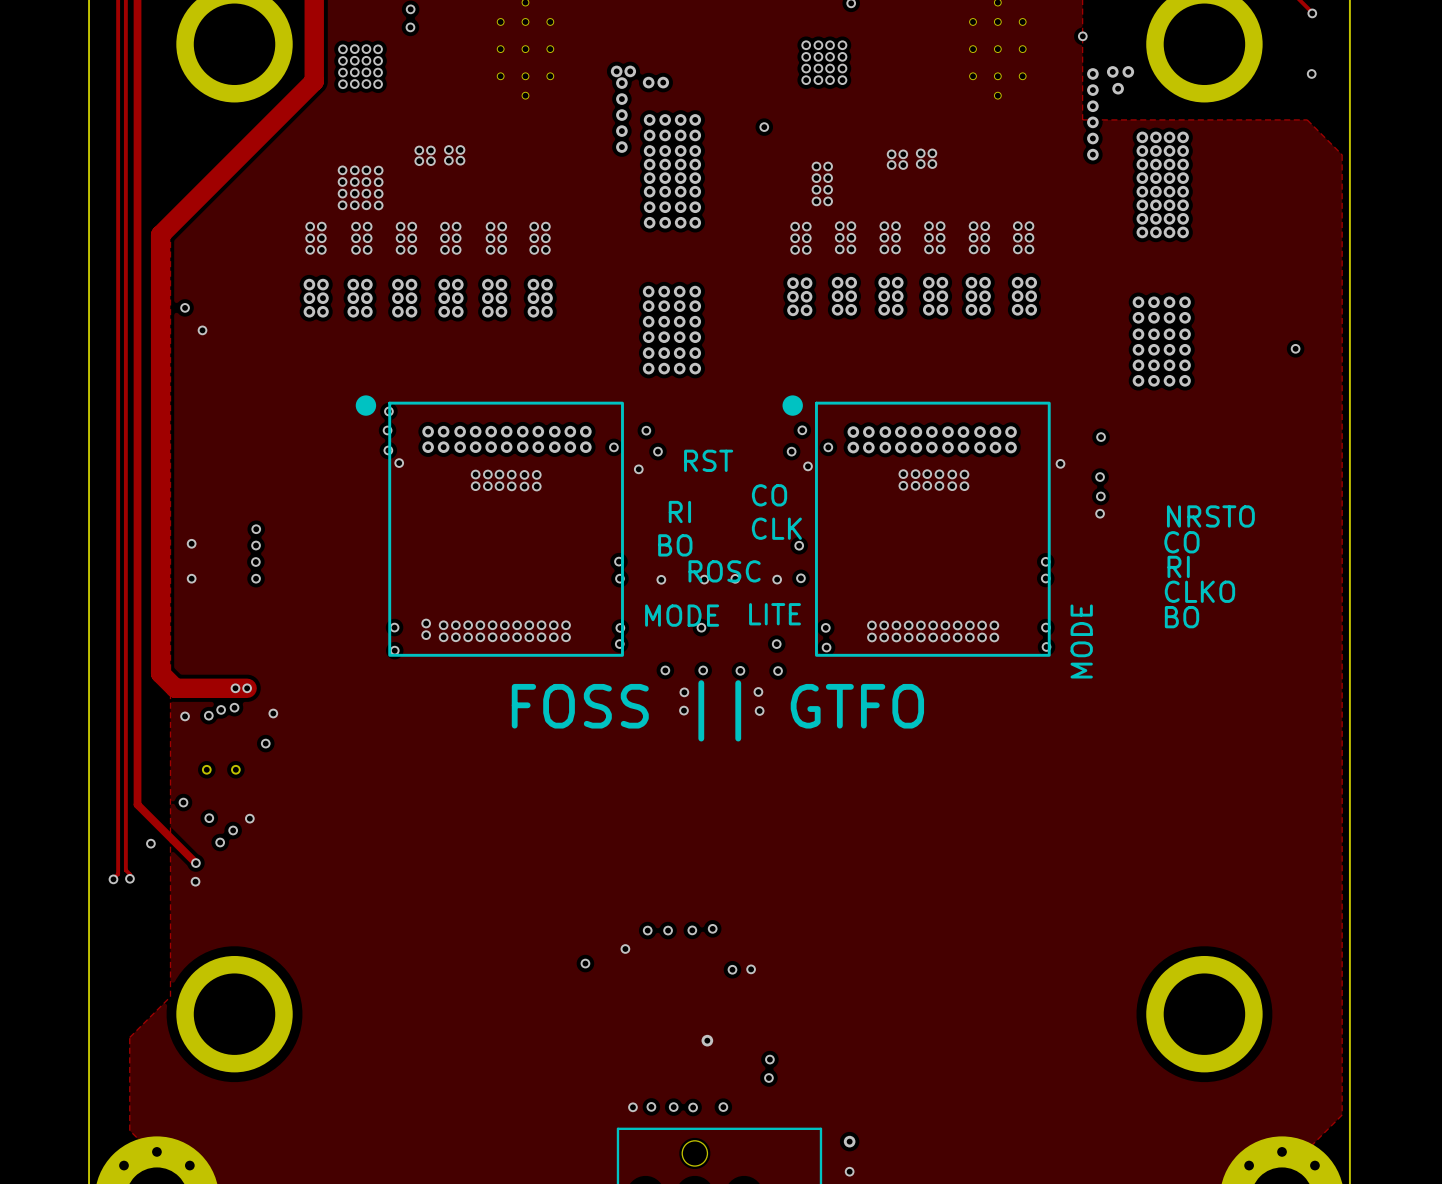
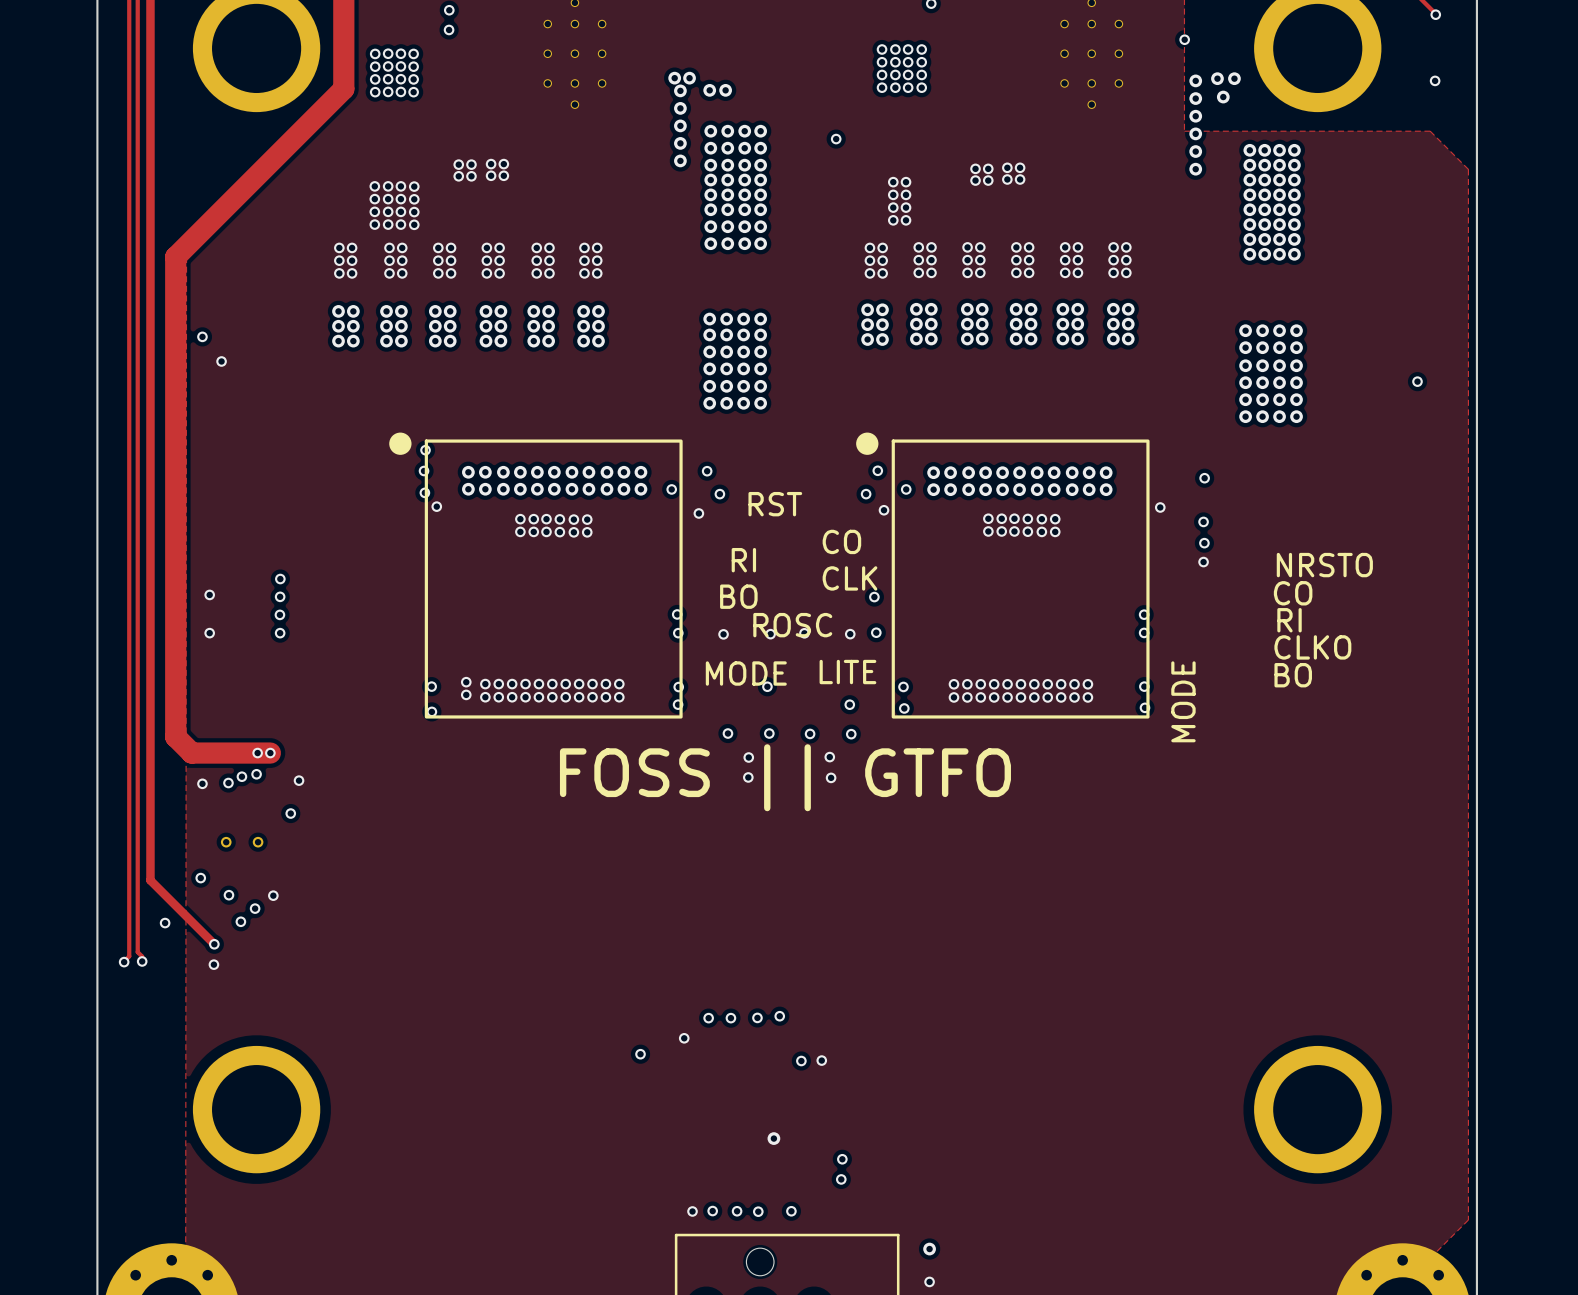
zone outline: (170, 225) (170, 996) (129, 1037) (129, 1130) (169, 1170) -> (186, 246) (185, 1280)

